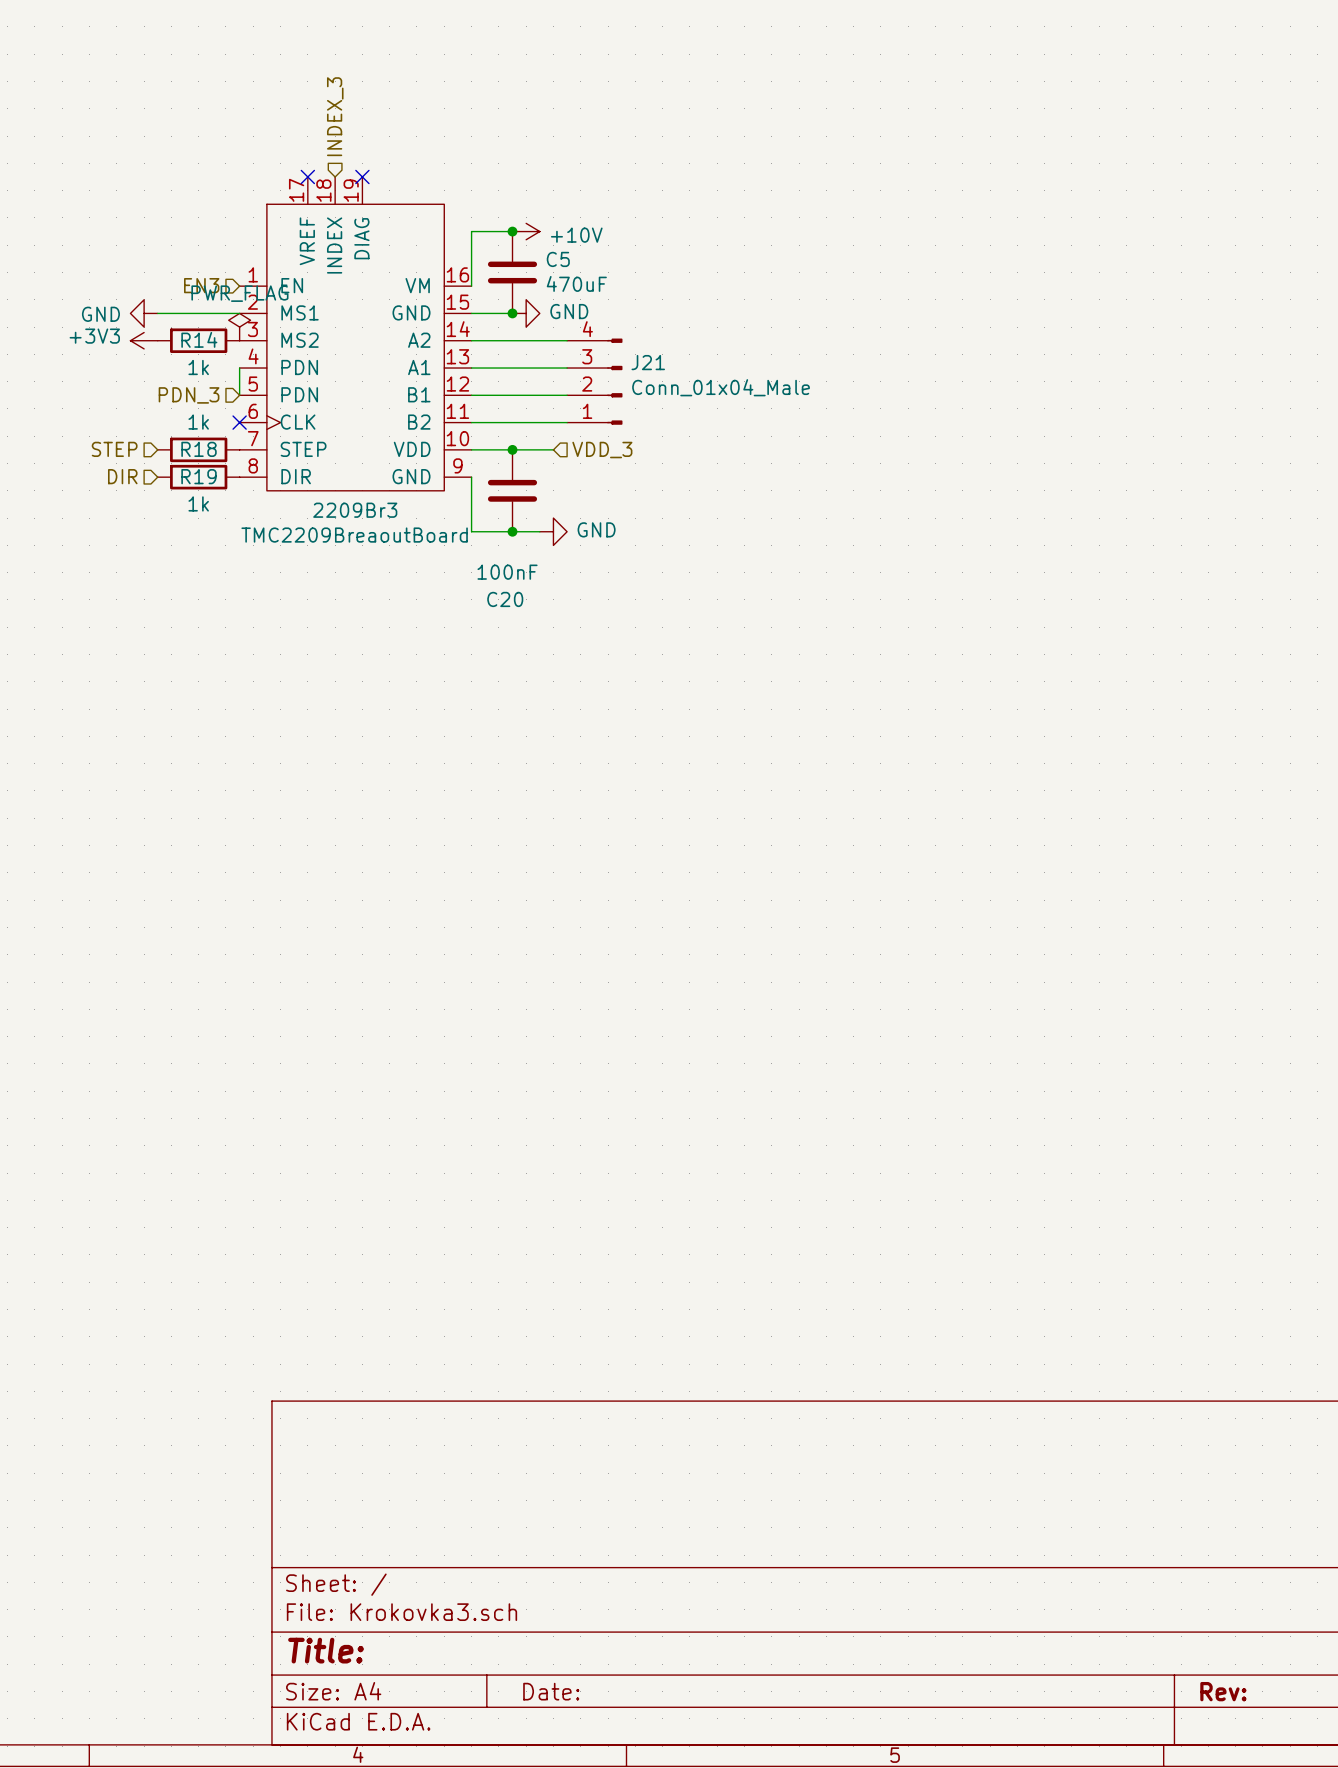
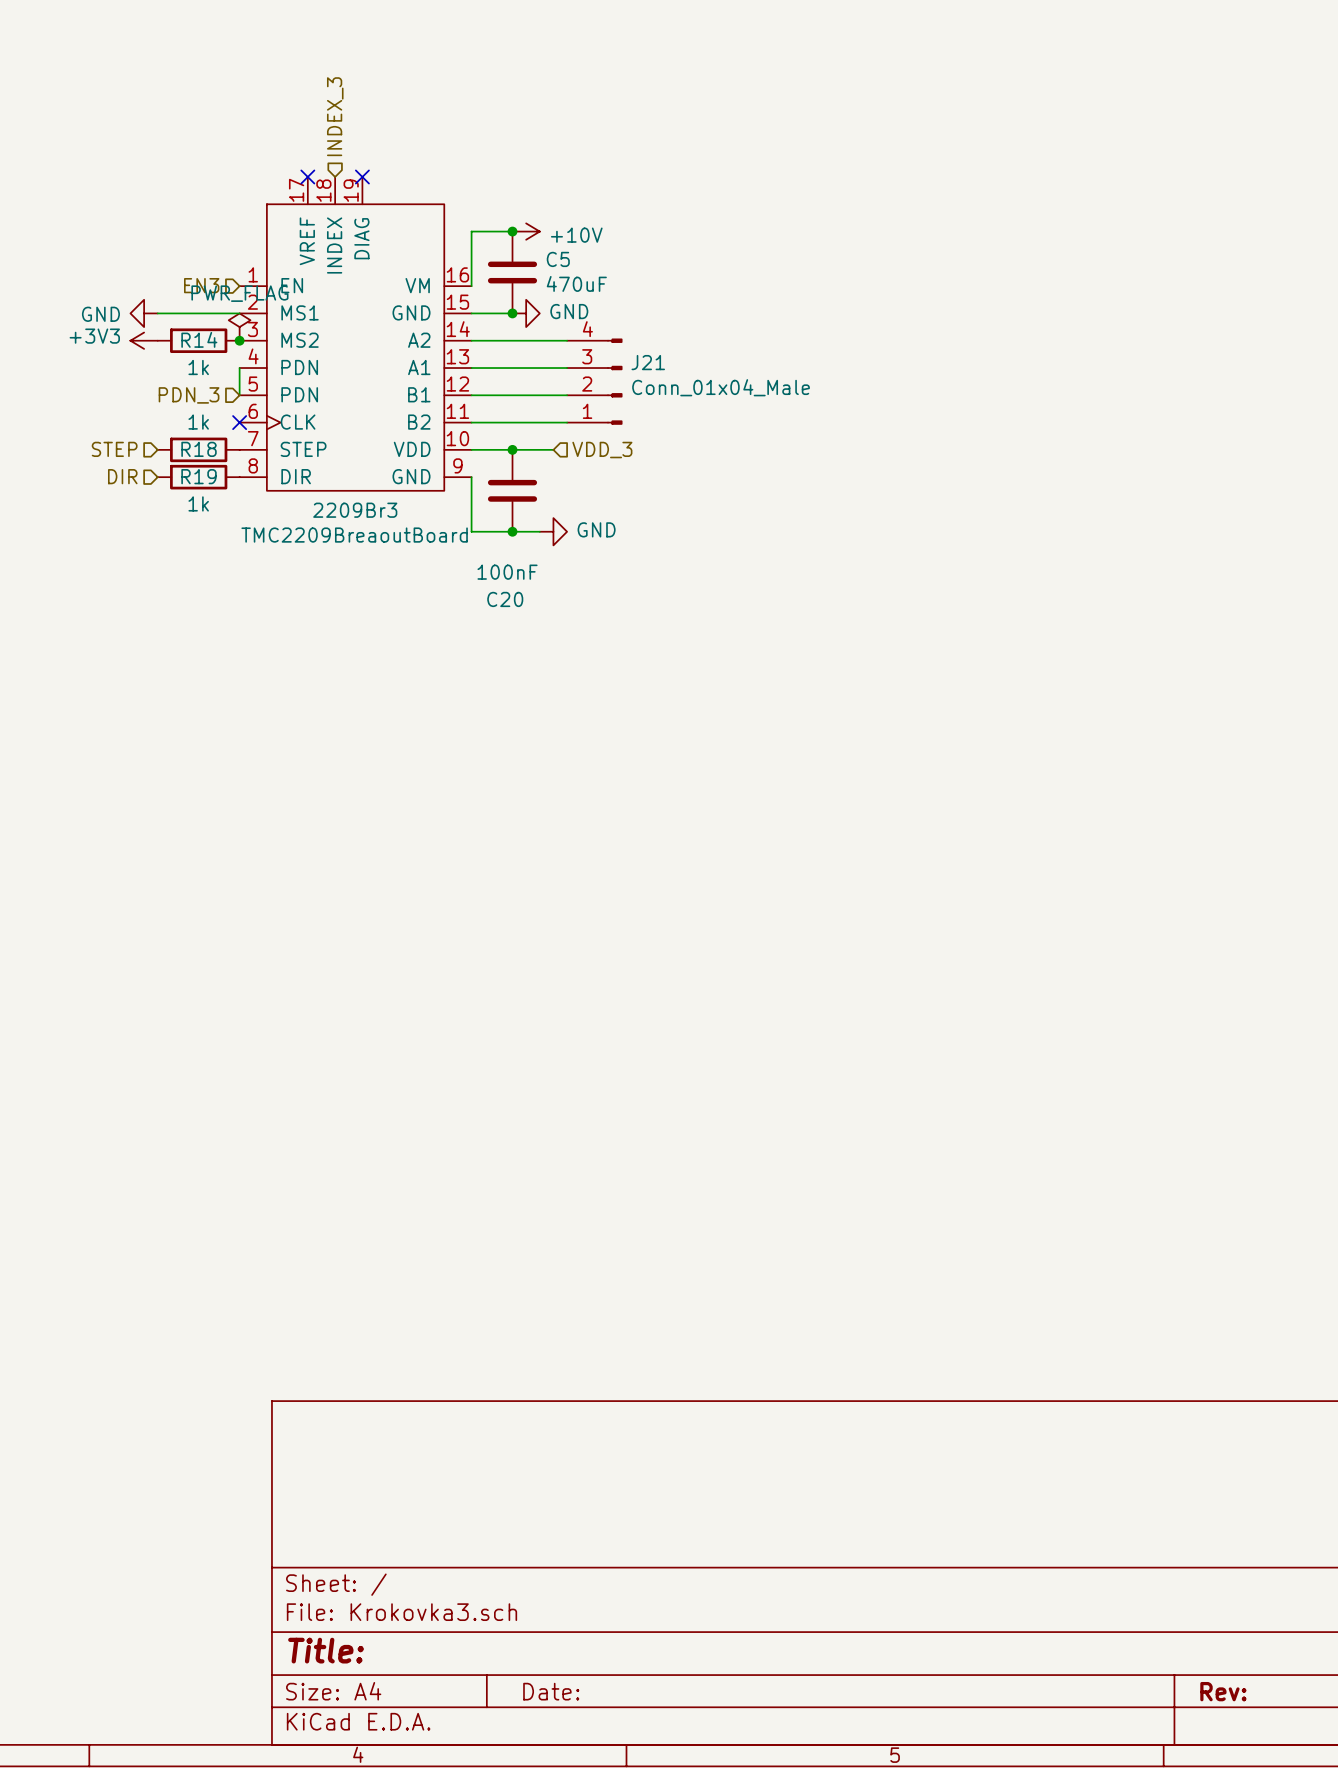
junction: none -> (239, 340)

